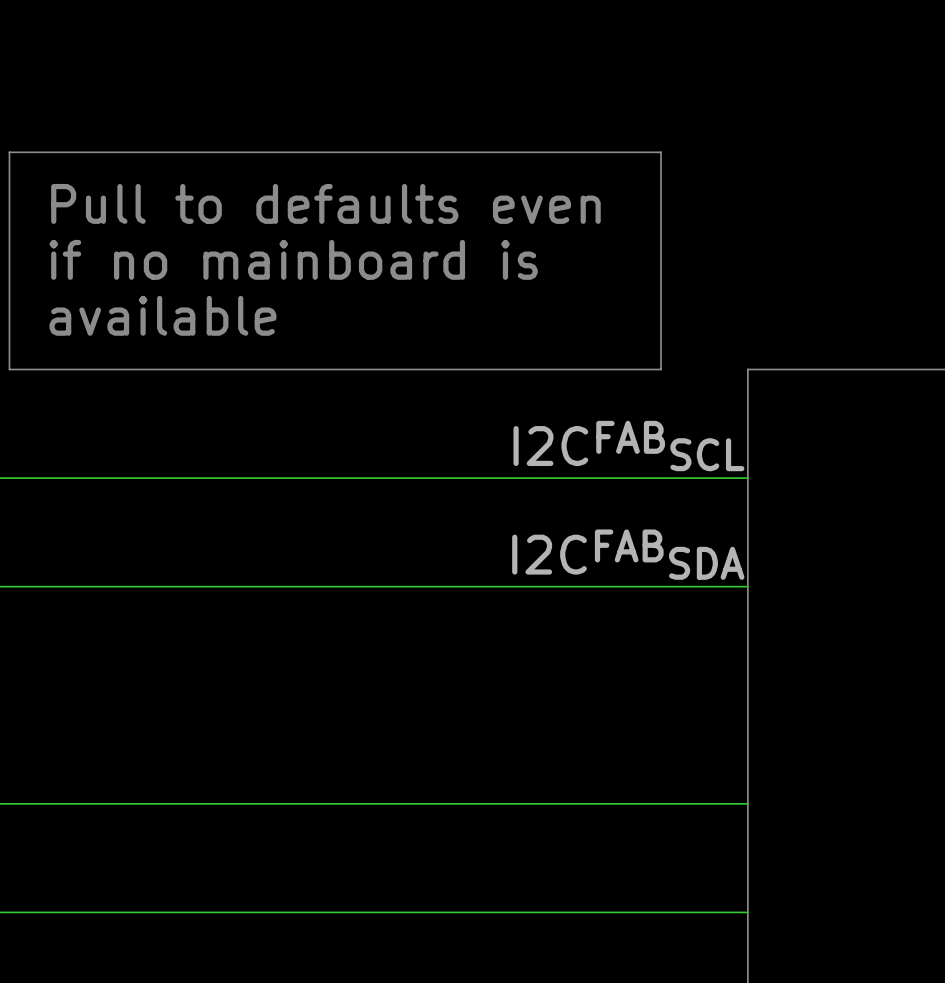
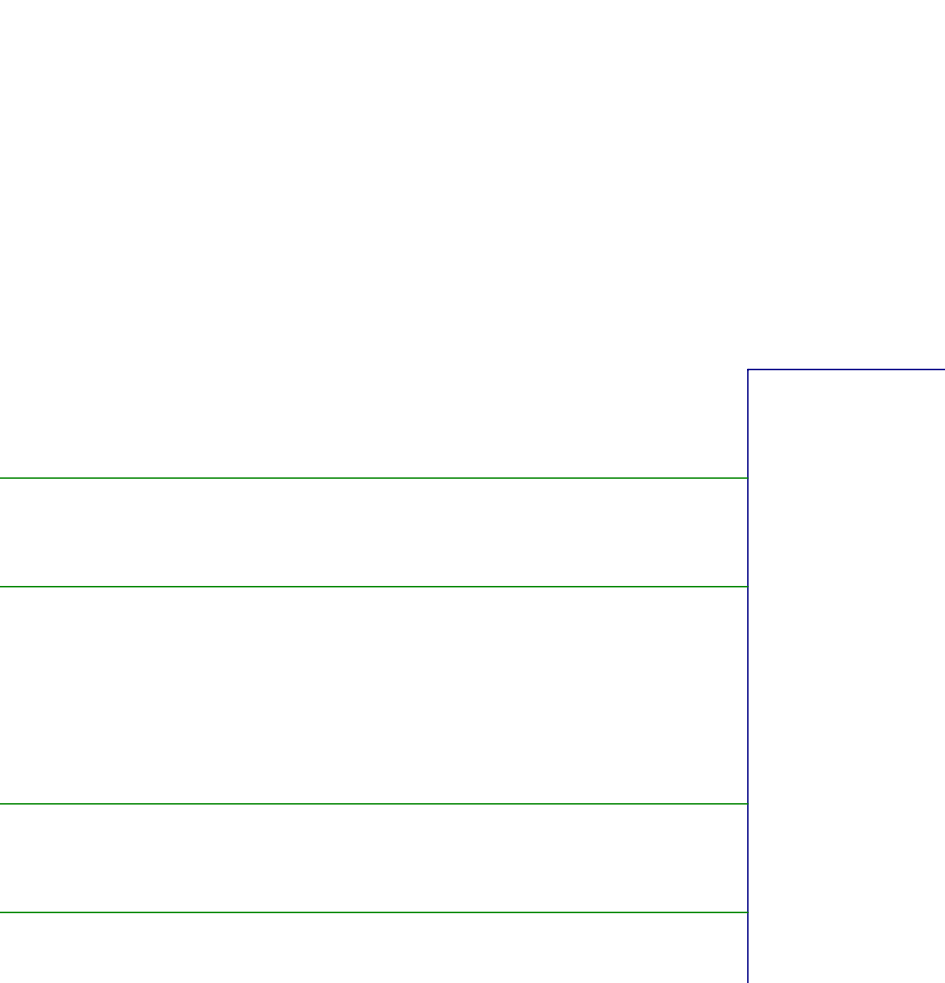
line: (9, 152) (661, 152) (661, 369) (9, 369) (9, 152) -> none
text: Pull to defaults even (325, 203) -> none
text: if no mainboard is (293, 259) -> none
text: available (162, 315) -> none
label: I2CFABSCL (628, 446) -> none
label: I2CFABSDA (628, 554) -> none

